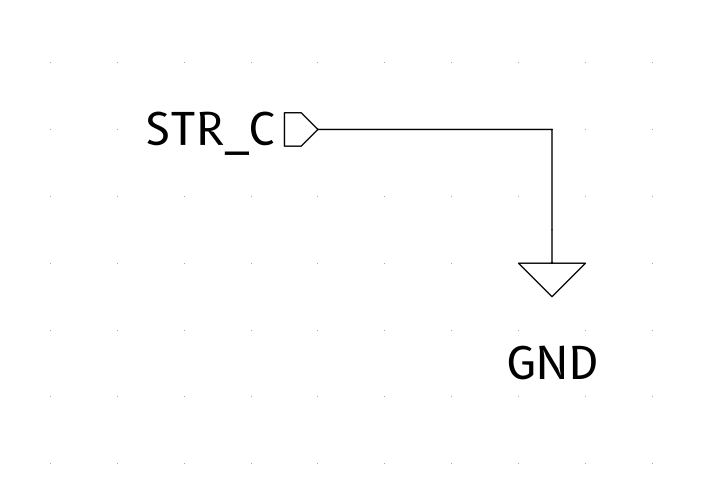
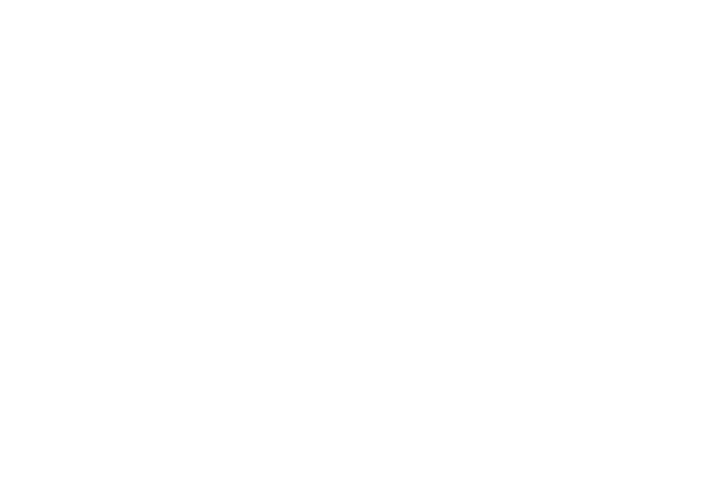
wire: (317, 129) (551, 129) (551, 229) -> none
hierarchical label: STR_C (210, 133) -> none
power symbol: GND (551, 263) -> none

